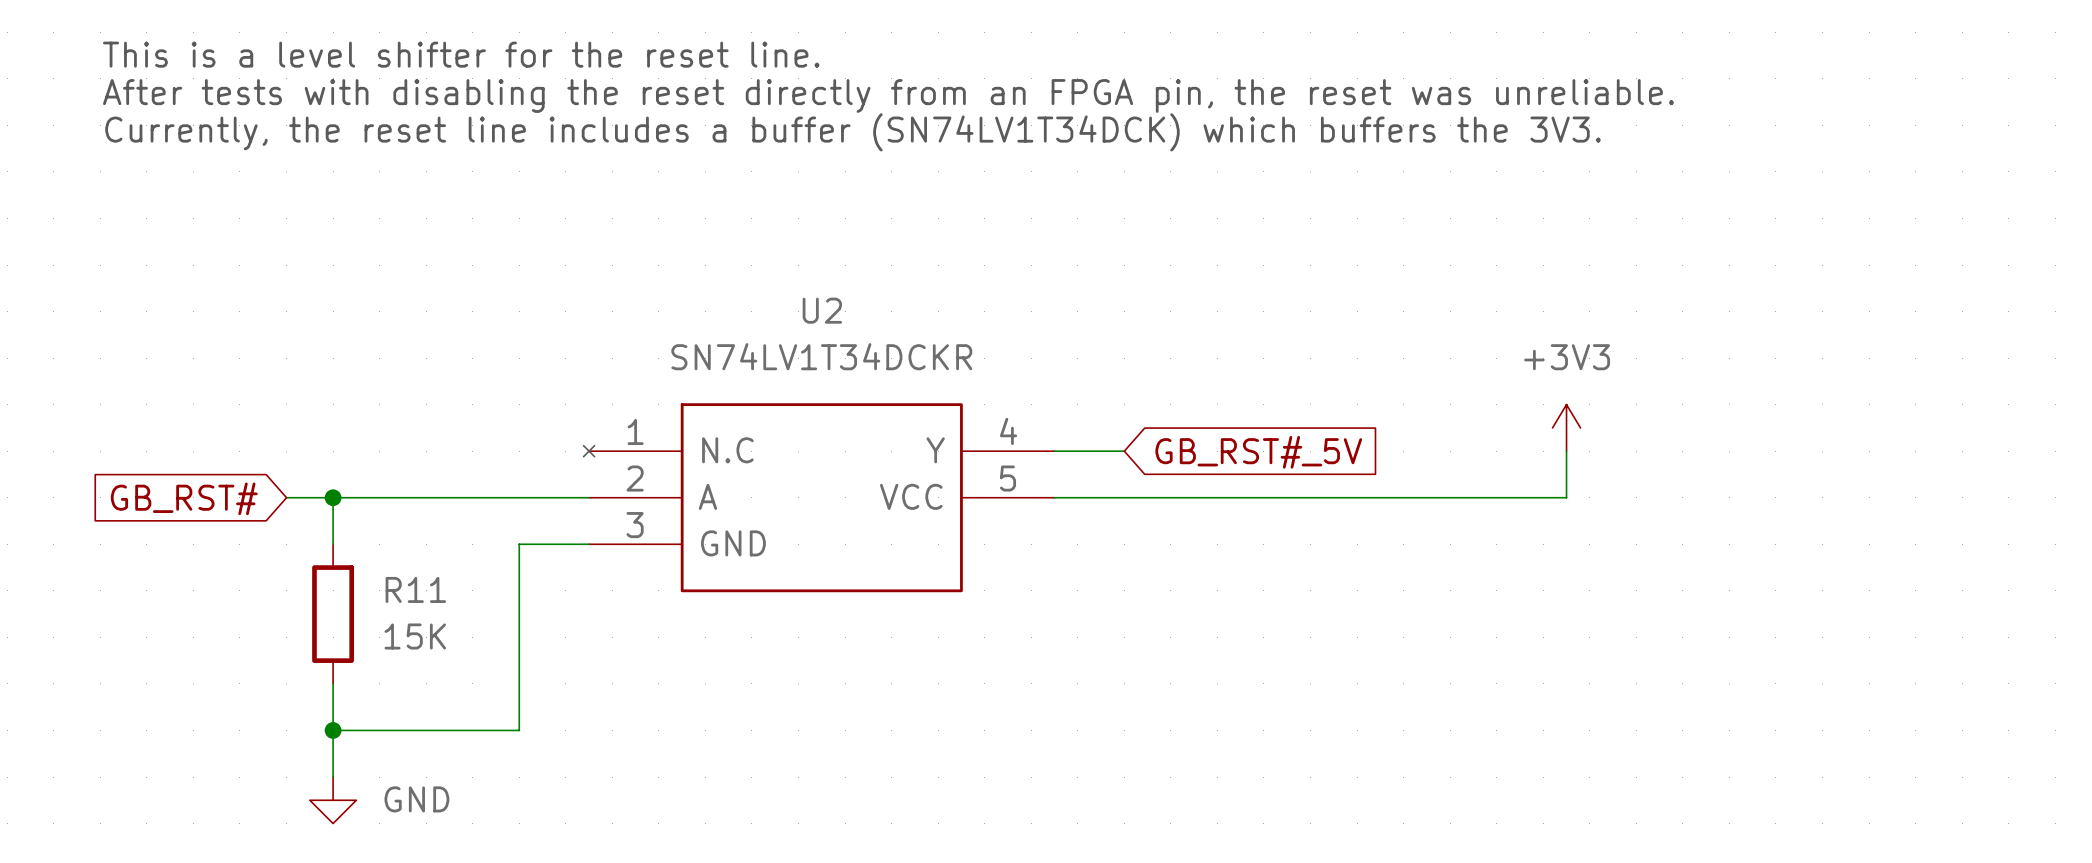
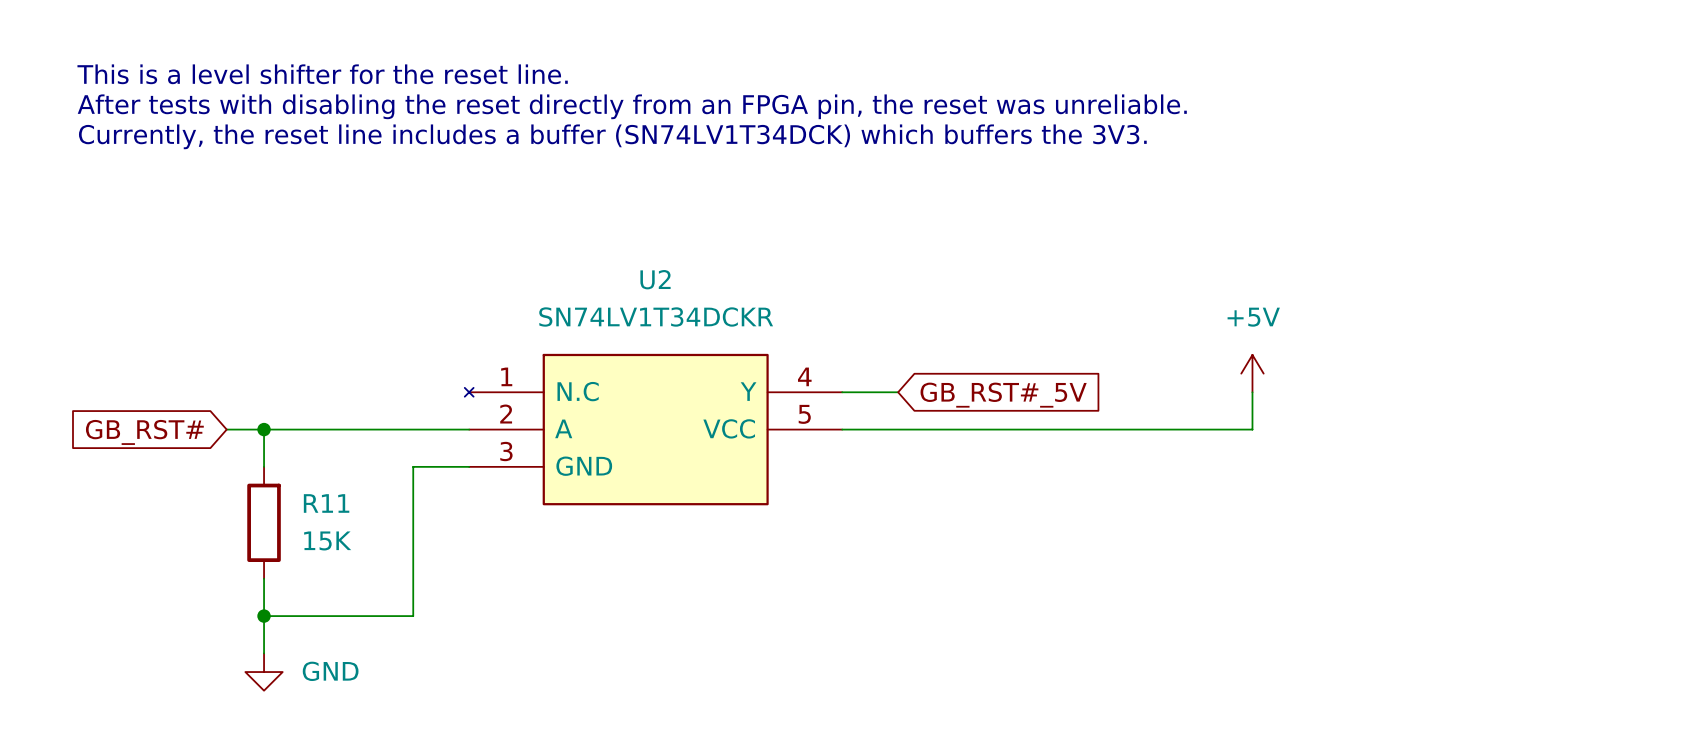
U2 symbol: [583, 403, 1055, 593] -> [464, 353, 843, 506]
power symbol: +3V3 (1566, 427) -> +5V (1252, 373)

